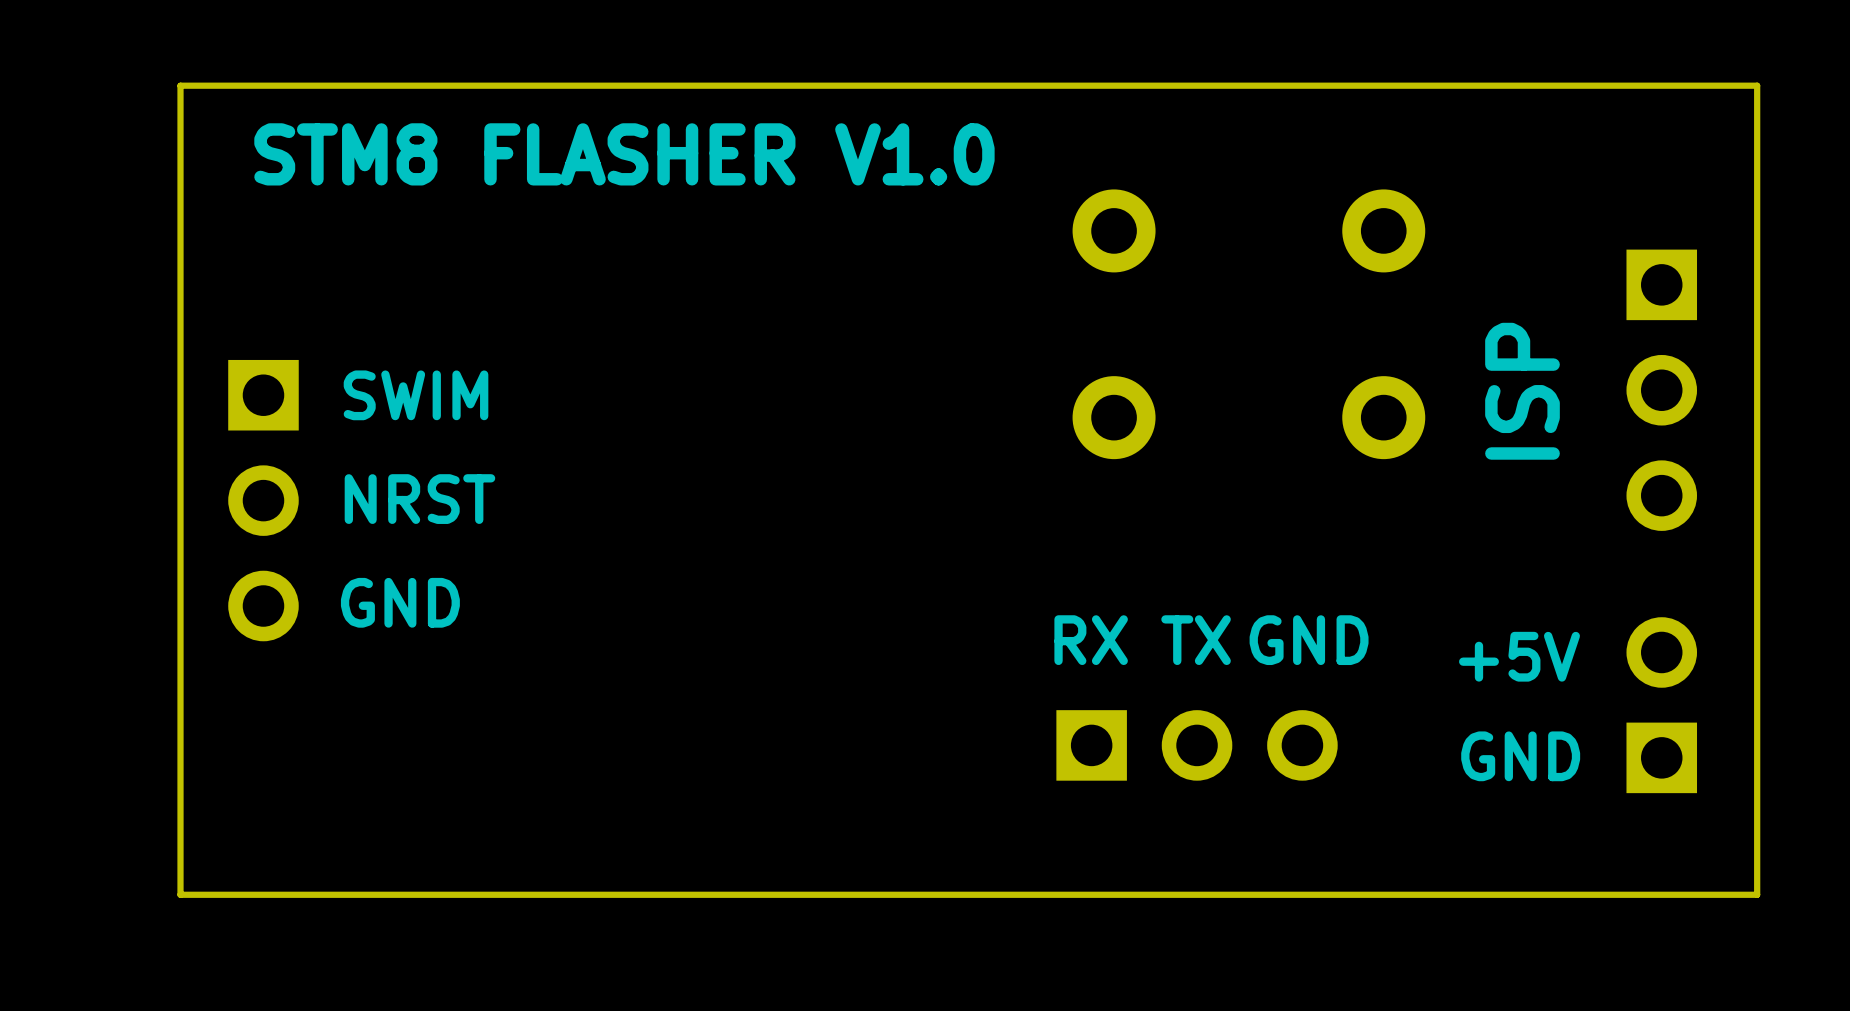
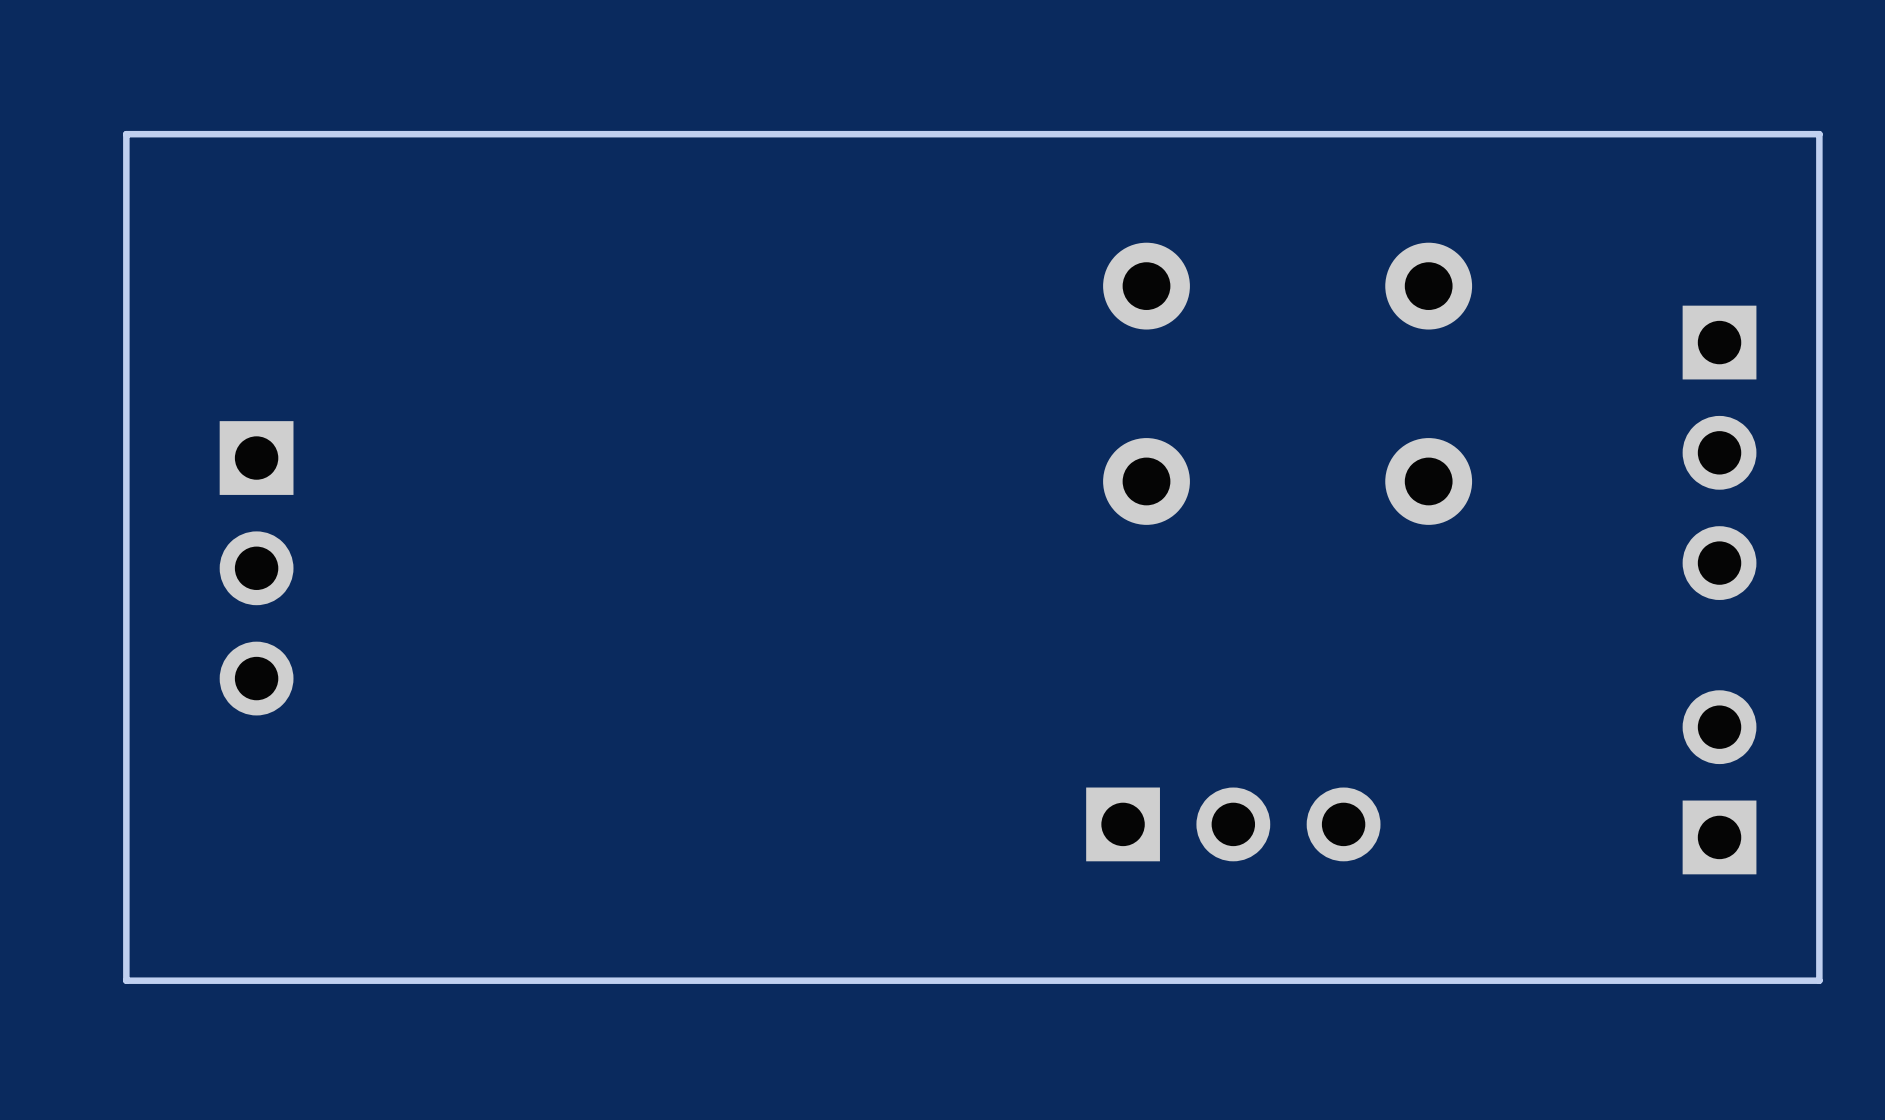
board edge: (180, 85) (180, 894) -> (169, 134) (126, 134) (126, 980) (169, 980)
text: STM8 FLASHER V1.0 (624, 154) -> none
text: ISP (1522, 391) -> none
text: SWIM (416, 395) -> none
text: NRST (419, 499) -> none
text: GND (400, 602) -> none
text: RX (1091, 640) -> none
text: TX (1196, 640) -> none
text: GND (1309, 640) -> none
text: +5V (1519, 656) -> none
text: GND (1520, 756) -> none

